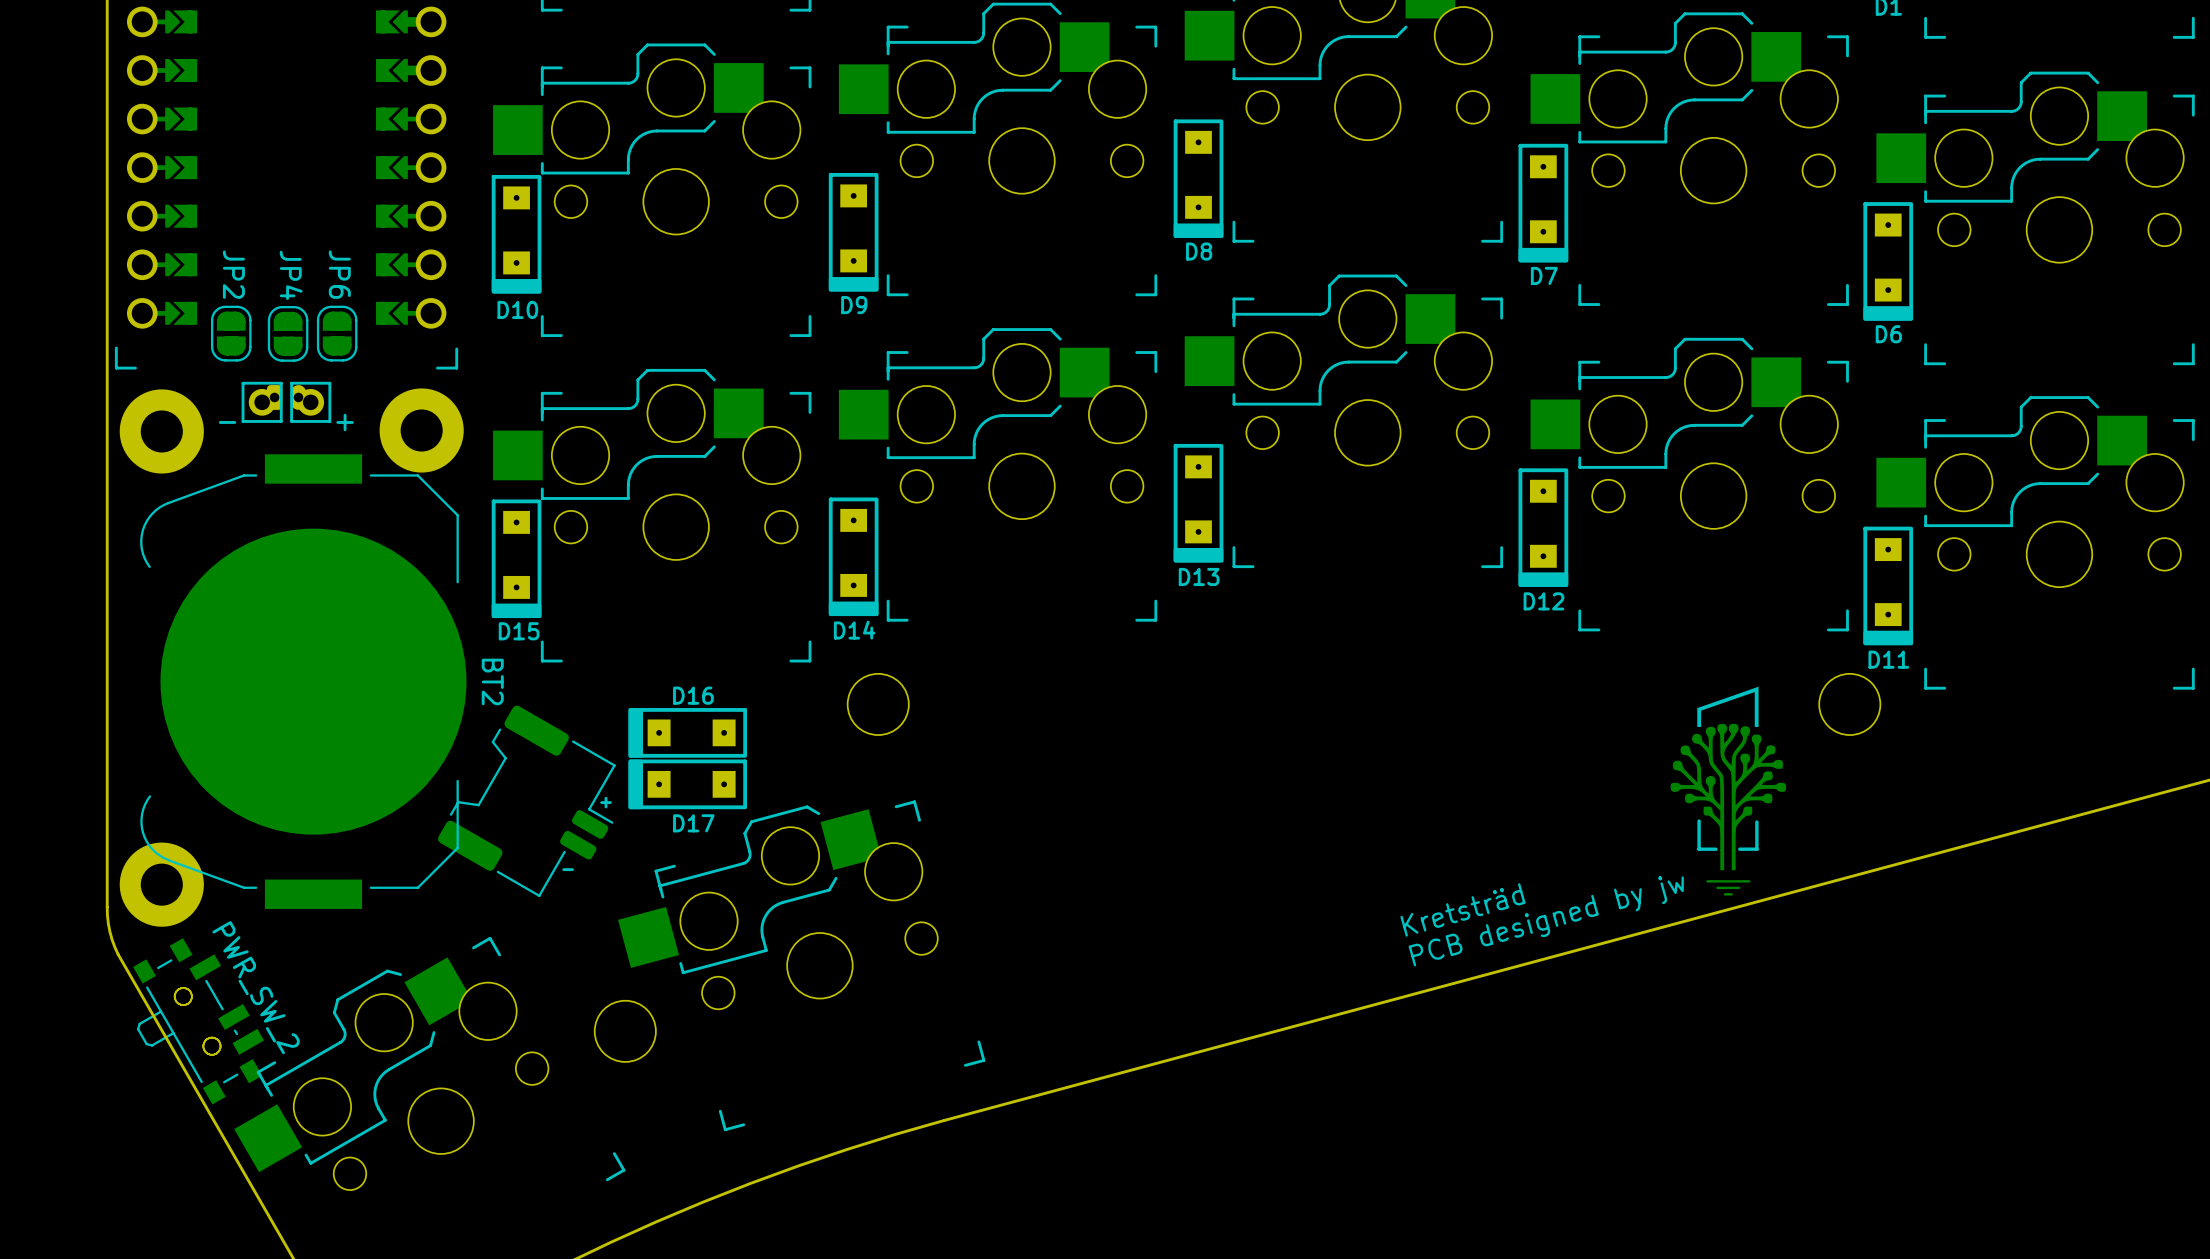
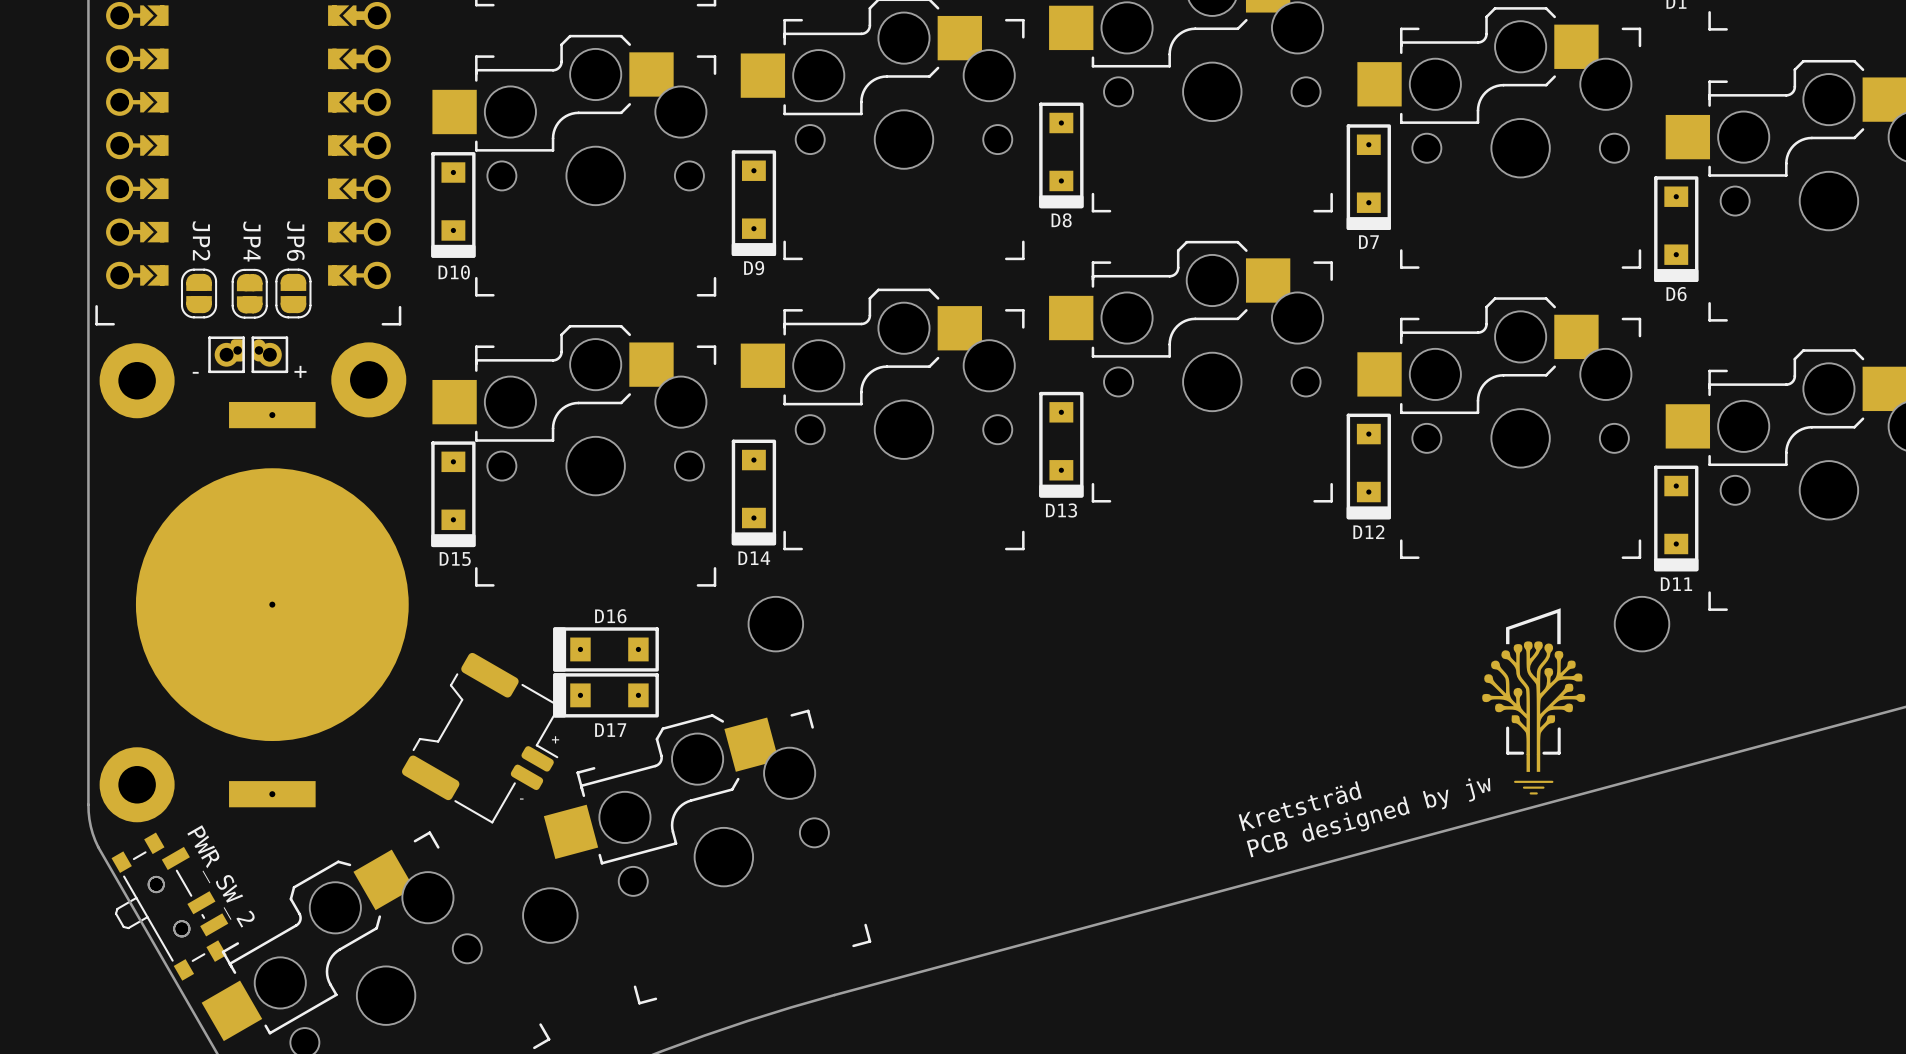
BT2: (303, 681) -> none
part: none -> (272, 604)
part position: (526, 801) -> (481, 738)
text position: + (605, 802) -> + (555, 739)
text position: - (568, 869) -> - (521, 799)

